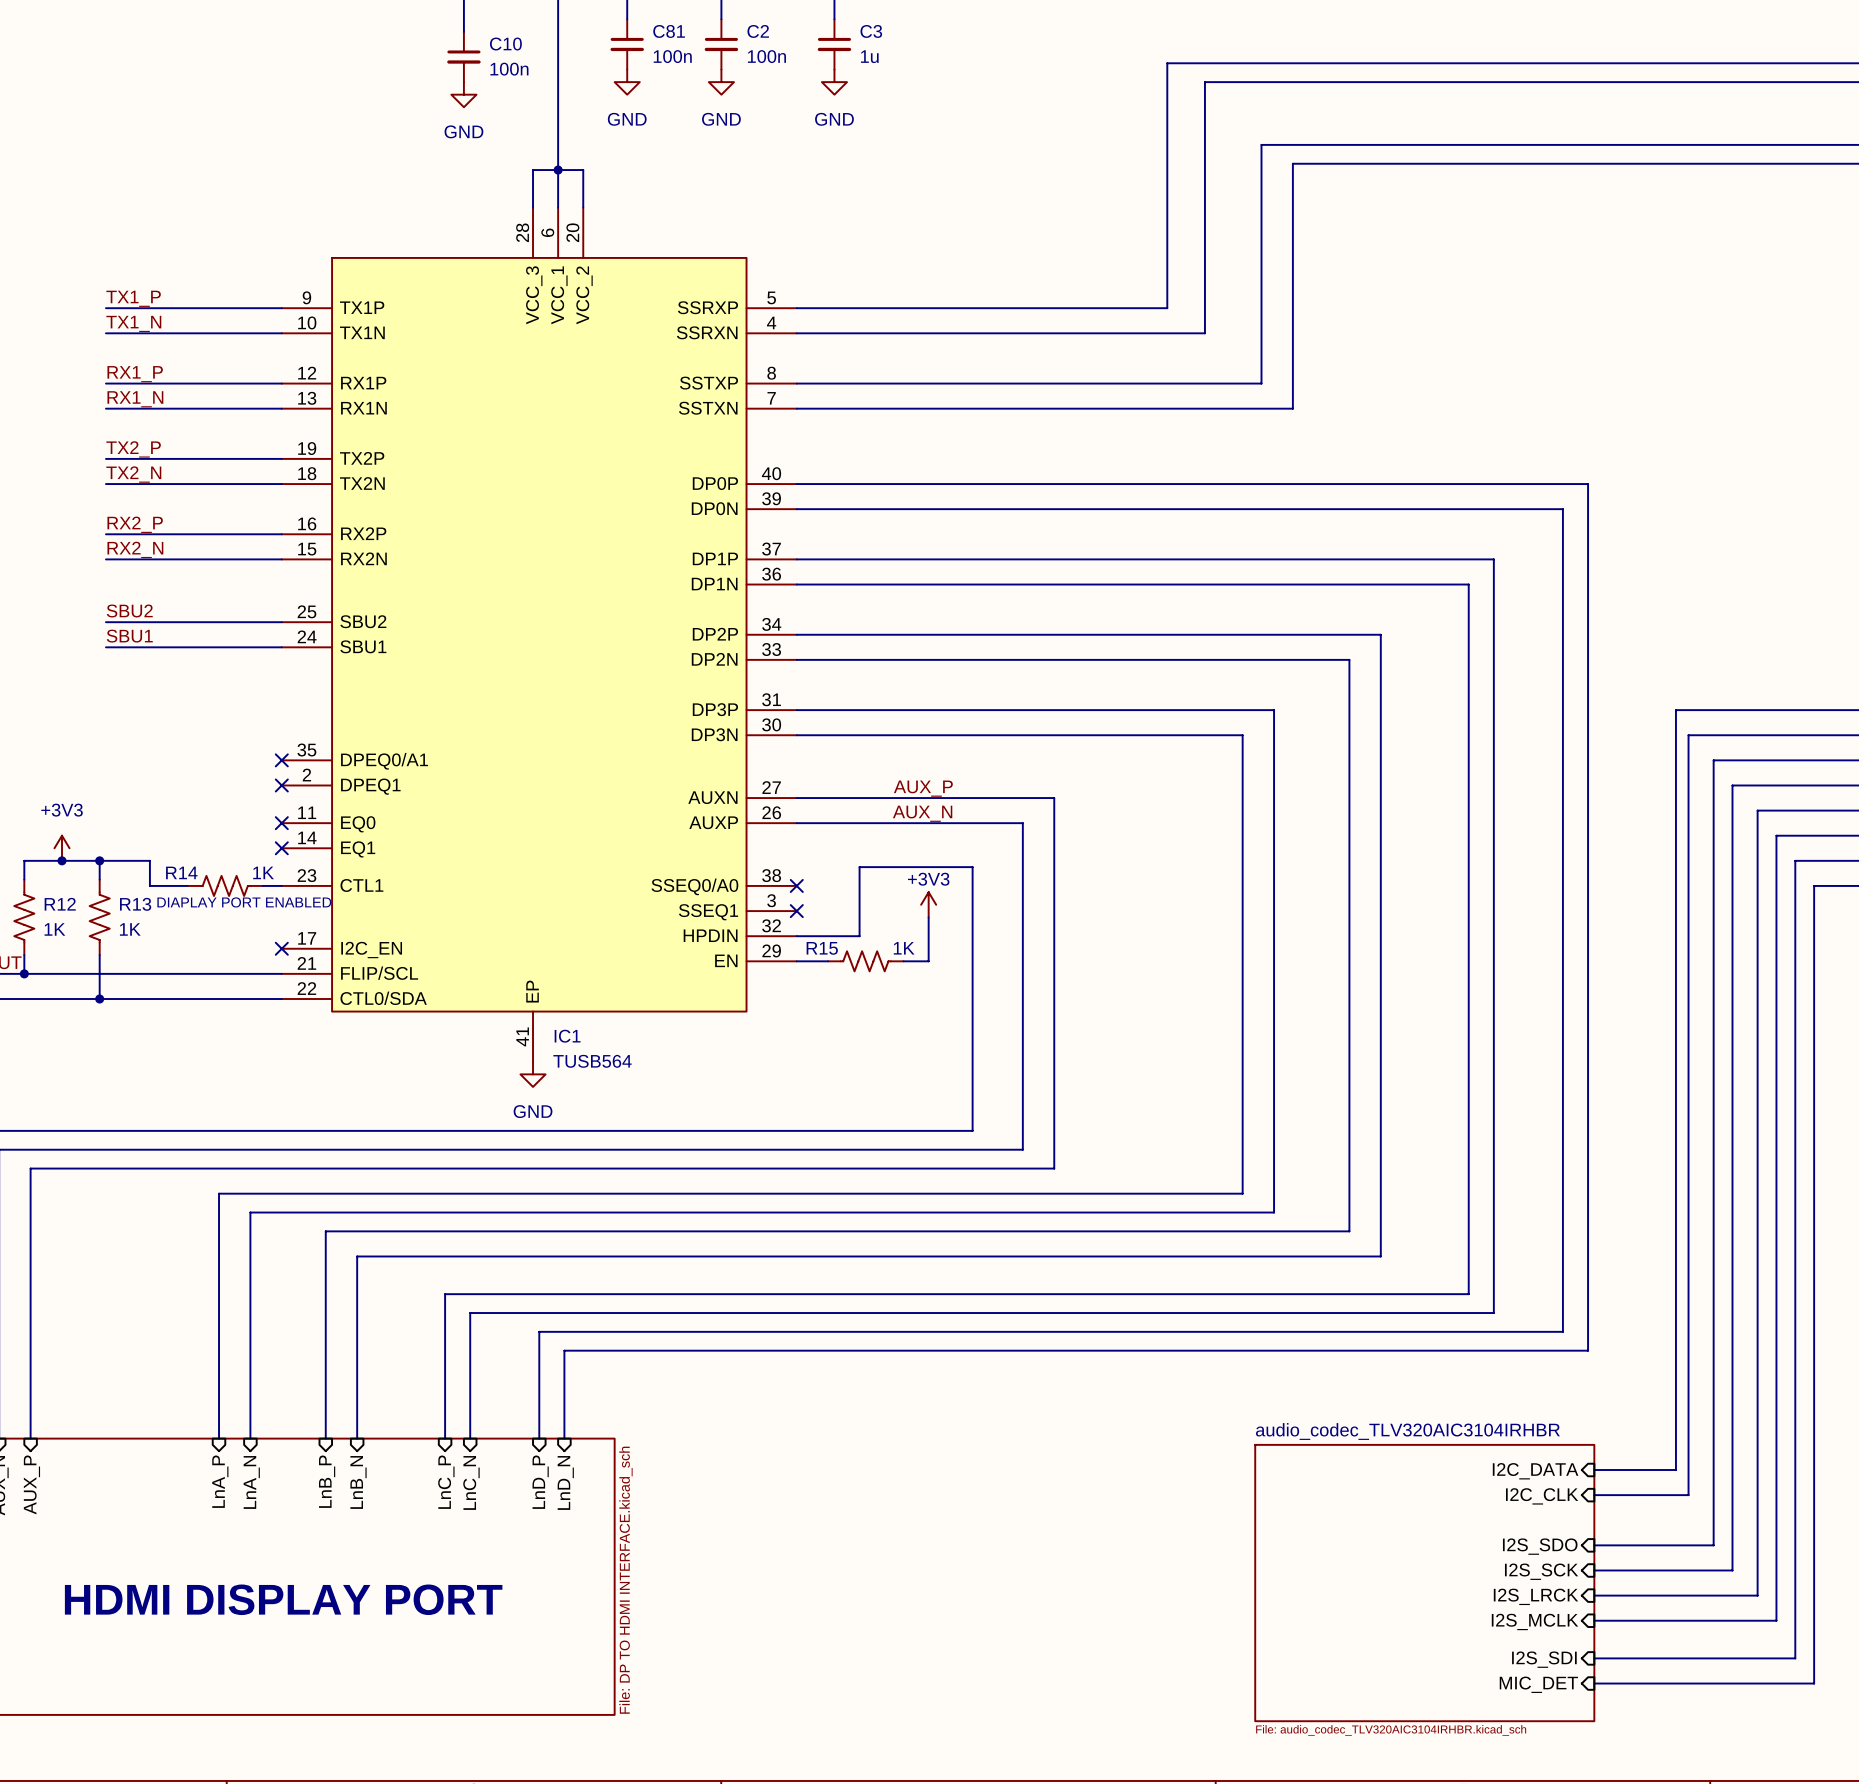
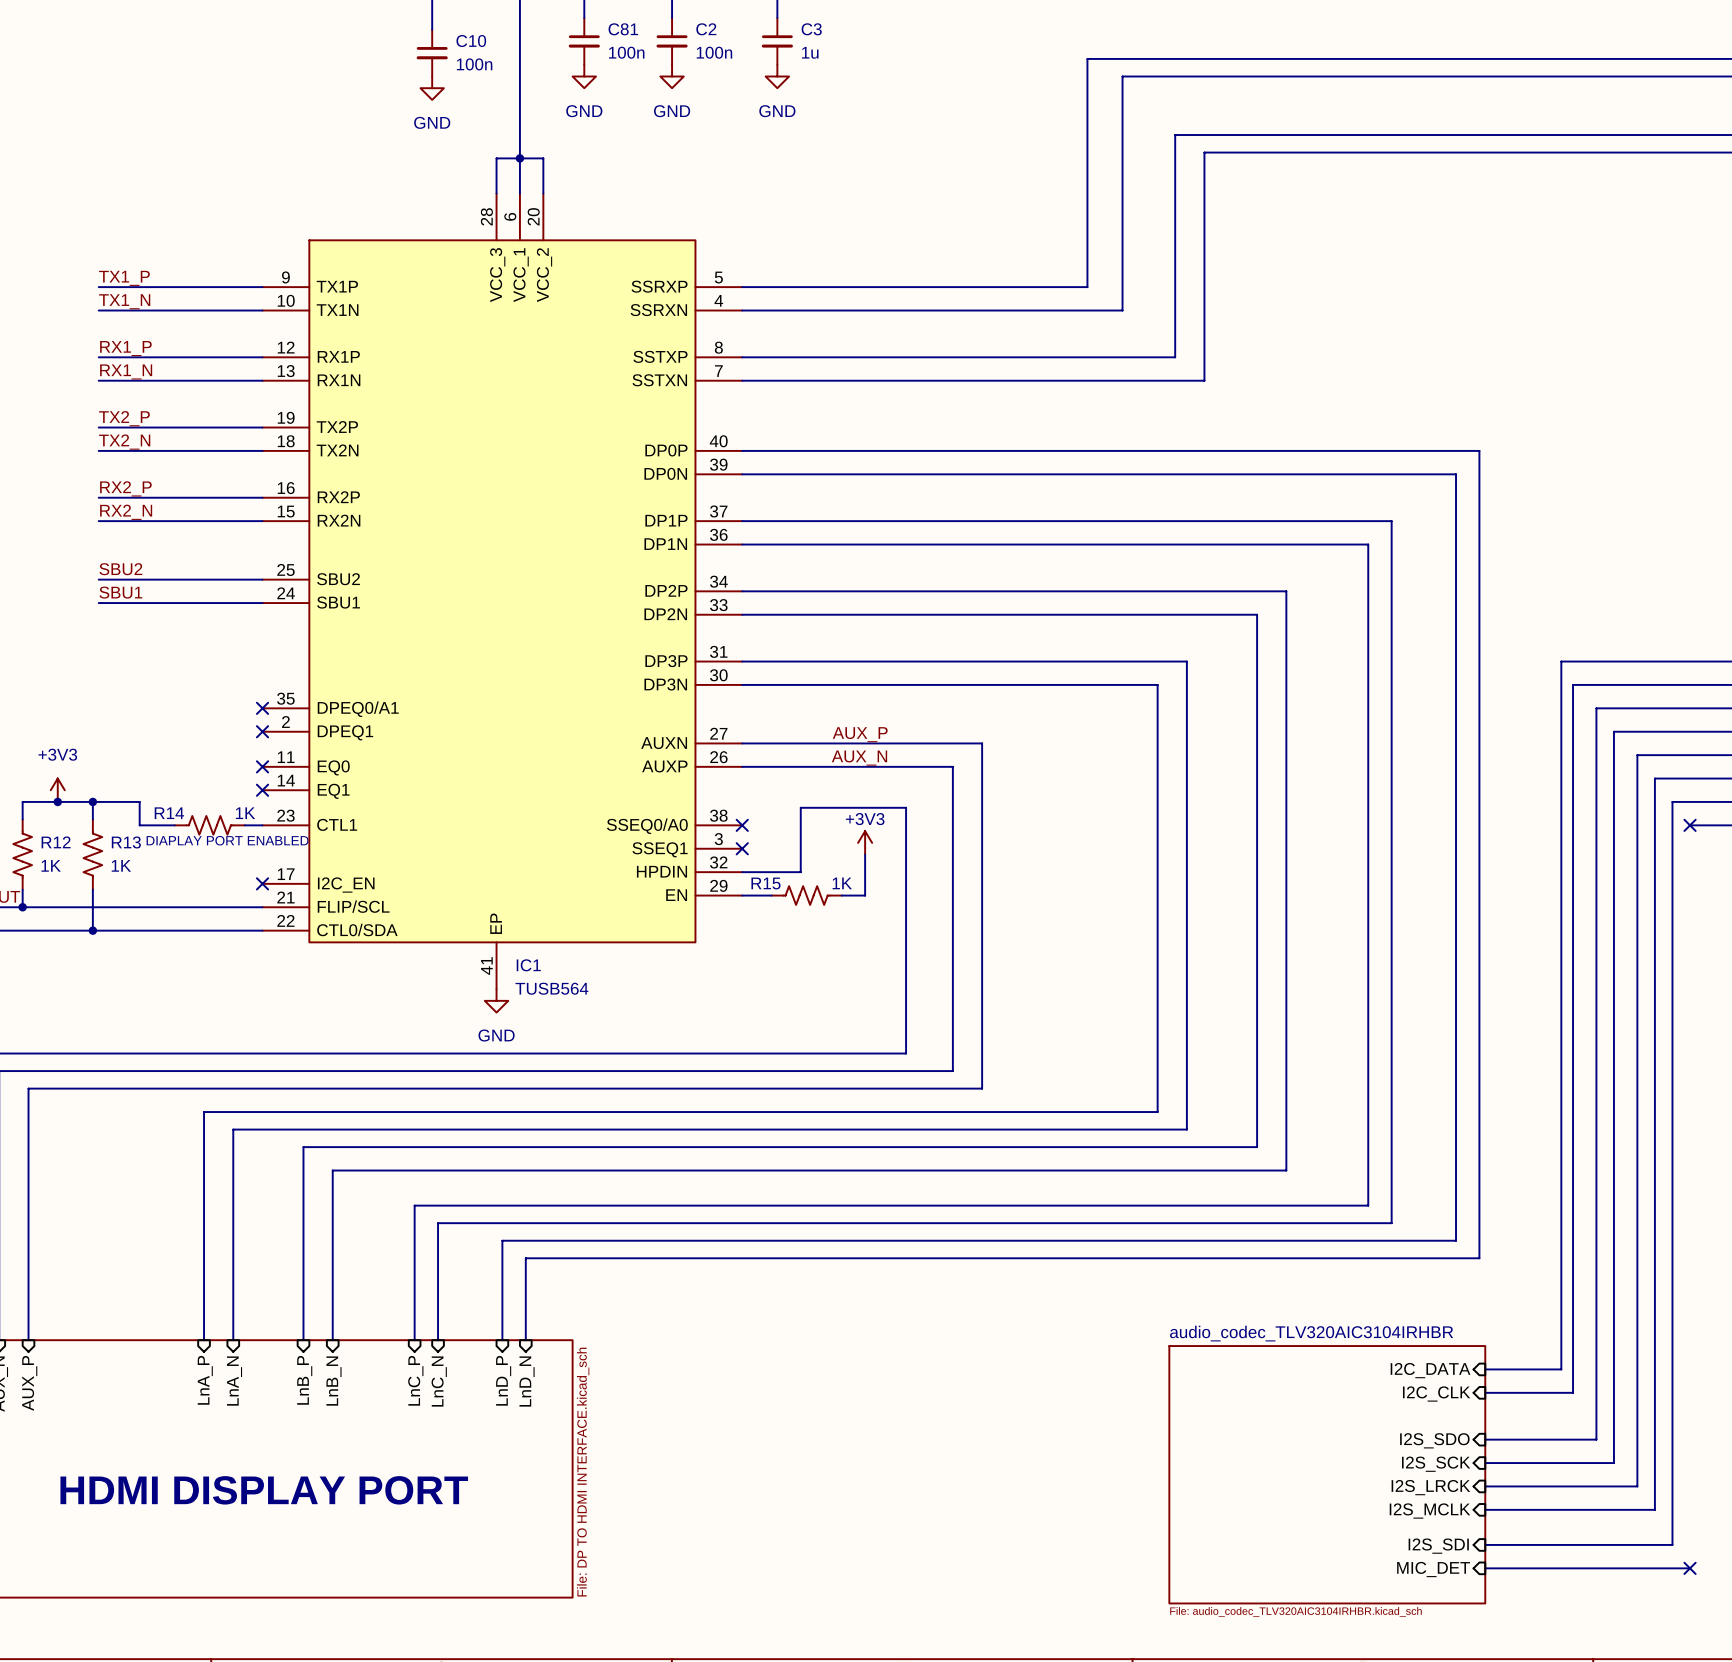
wire: (1814, 885) (1814, 1683) -> none
no-connect mark: none -> (1690, 825)
no-connect mark: none -> (1690, 1568)

